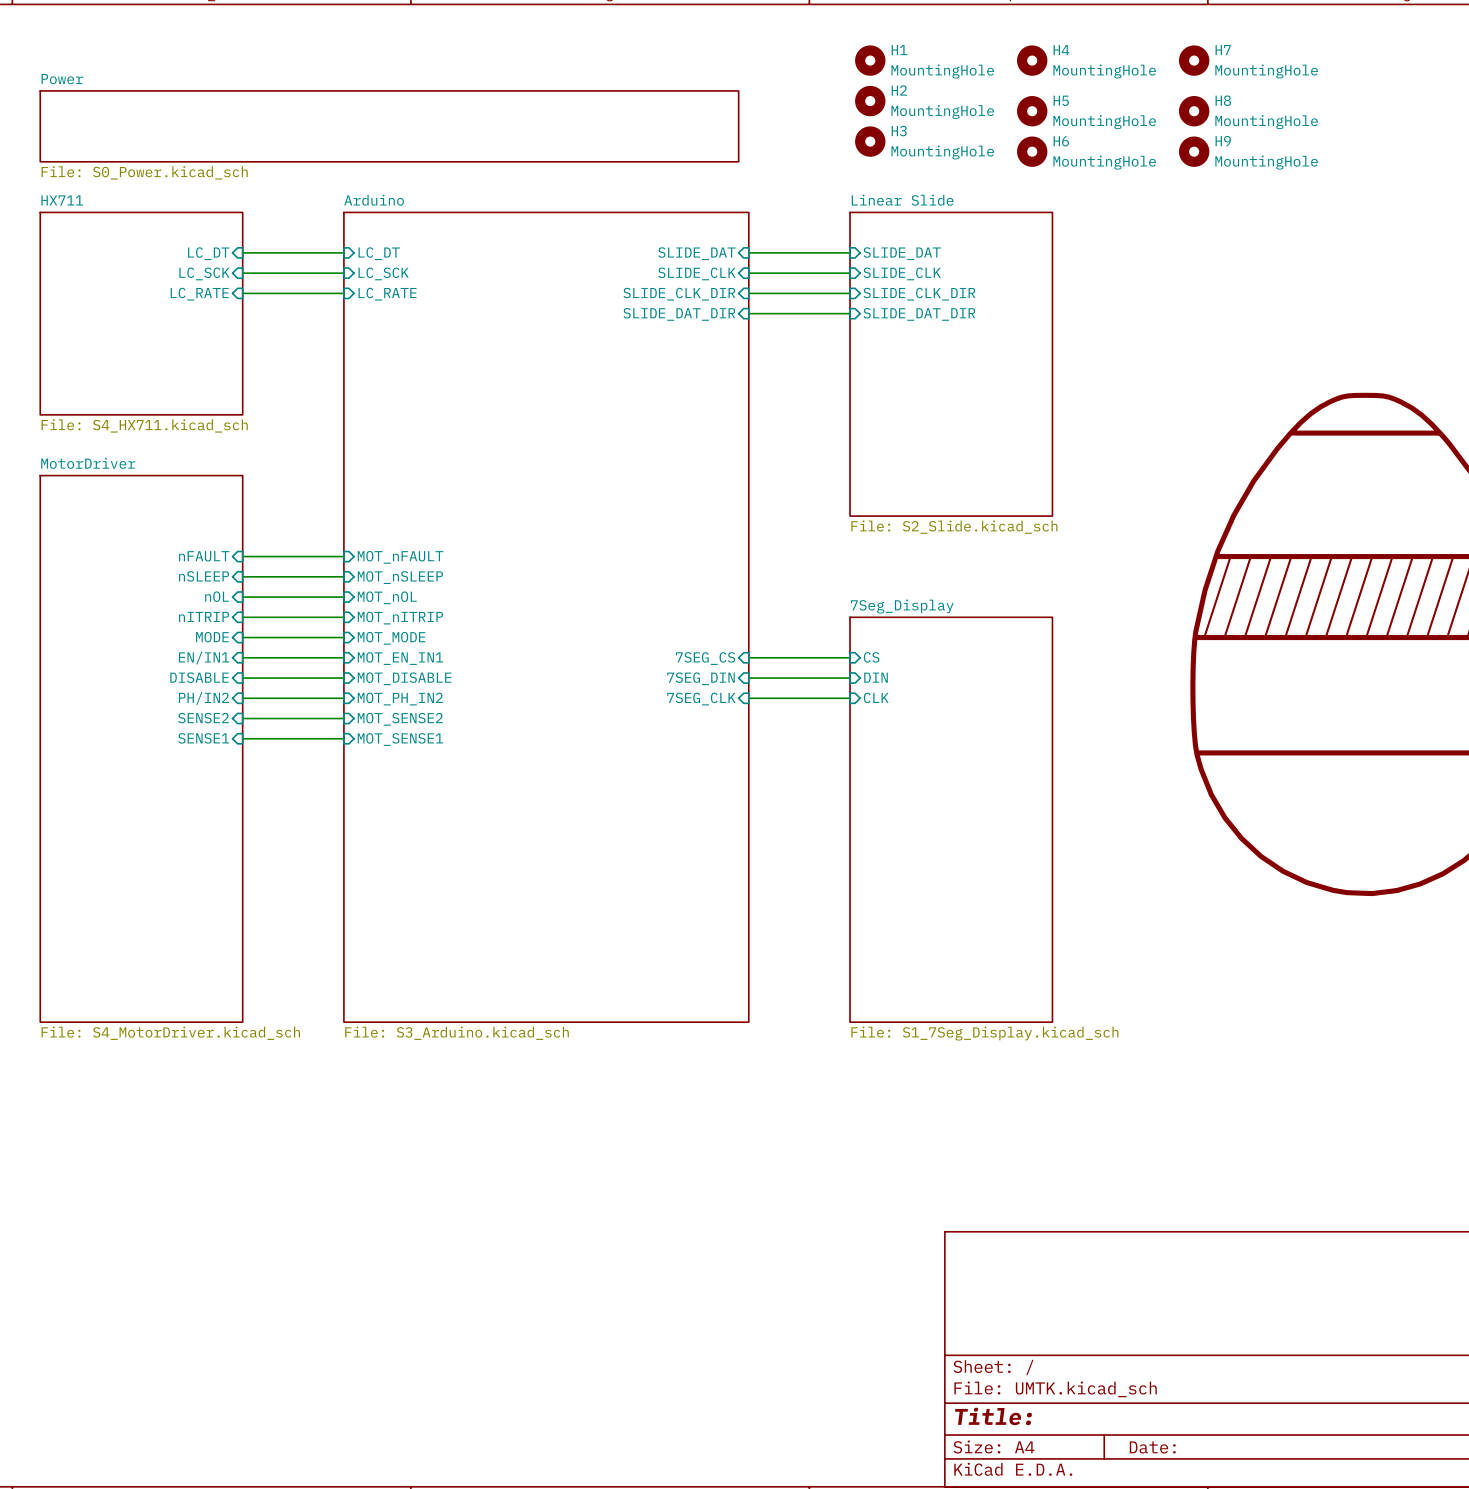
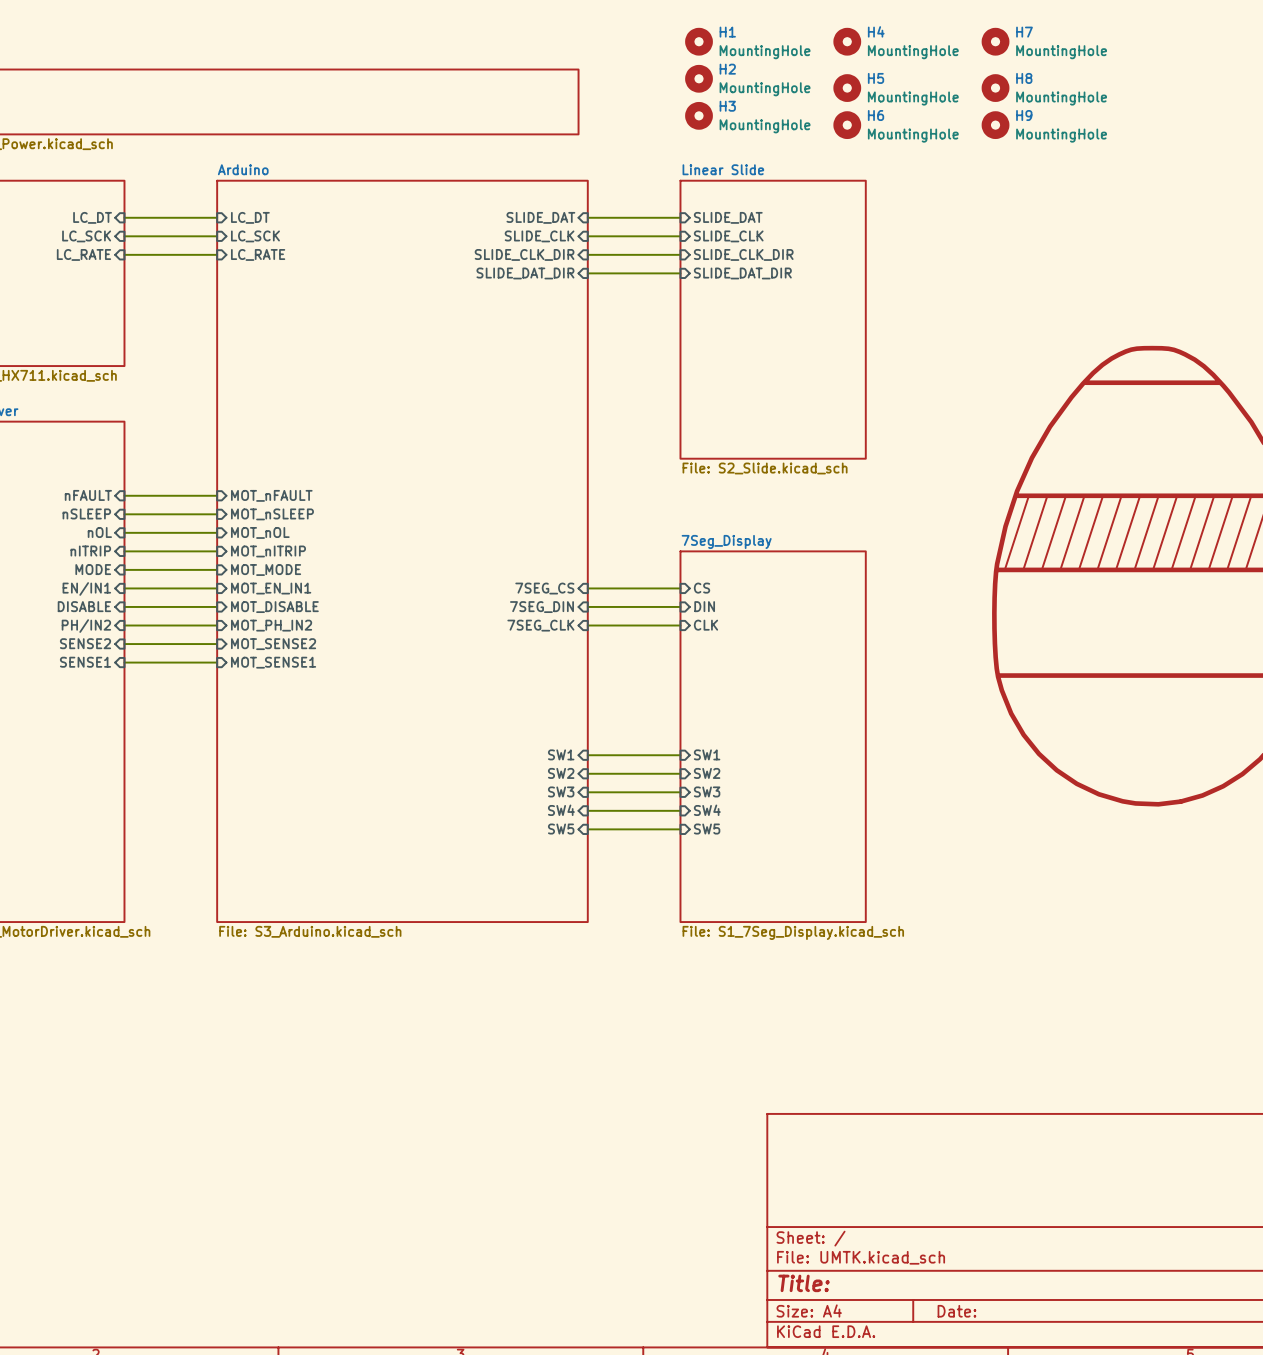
sheet pin: none -> SW1 (561, 754)
wire: none -> (587, 755) (680, 755)
sheet pin: none -> SW1 (707, 754)
sheet pin: none -> SW2 (561, 773)
sheet pin: none -> SW2 (707, 773)
wire: none -> (587, 773) (680, 773)
sheet pin: none -> SW3 (561, 791)
wire: none -> (587, 792) (680, 792)
sheet pin: none -> SW3 (707, 791)
sheet pin: none -> SW4 (561, 810)
wire: none -> (587, 810) (680, 810)
sheet pin: none -> SW4 (707, 810)
sheet pin: none -> SW5 (561, 829)
wire: none -> (587, 829) (680, 829)
sheet pin: none -> SW5 (707, 829)

